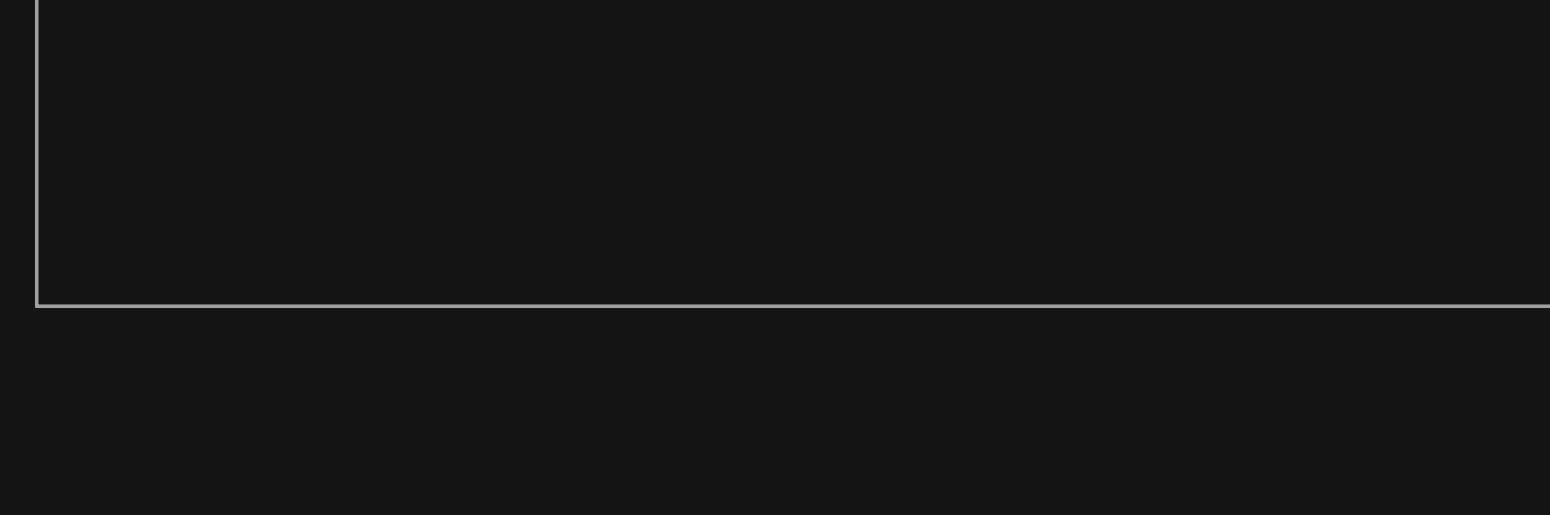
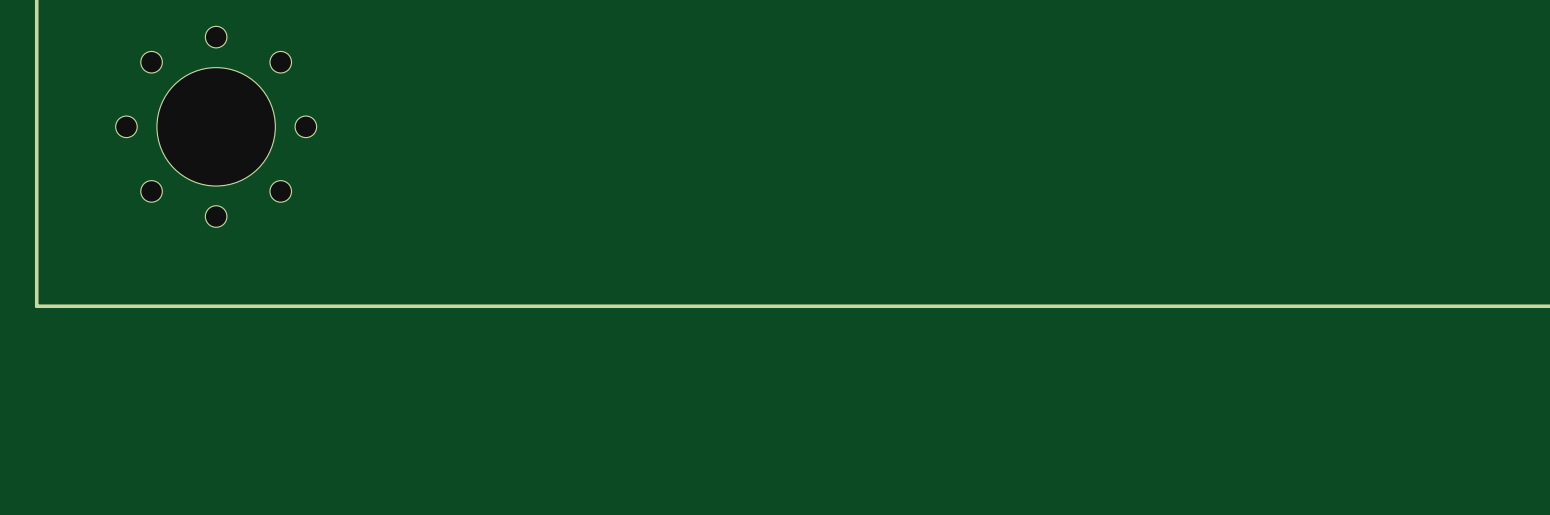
part: none -> (216, 126)

